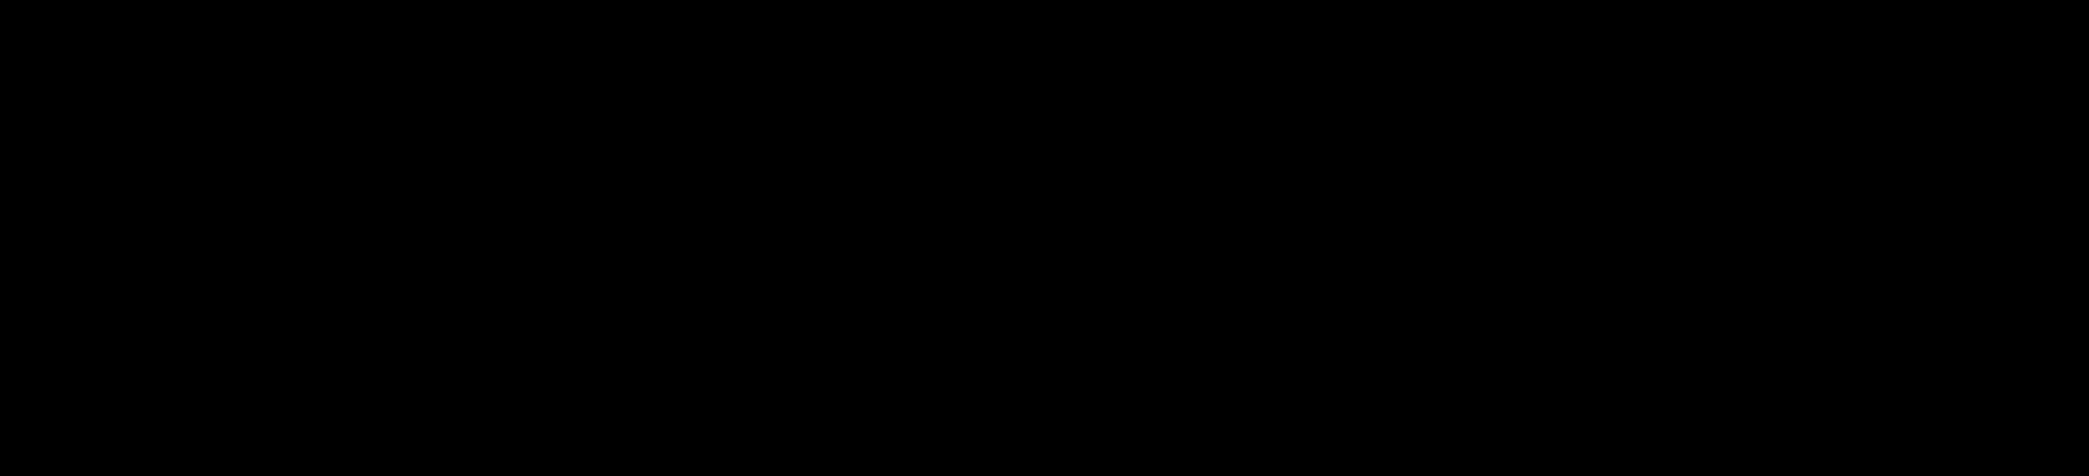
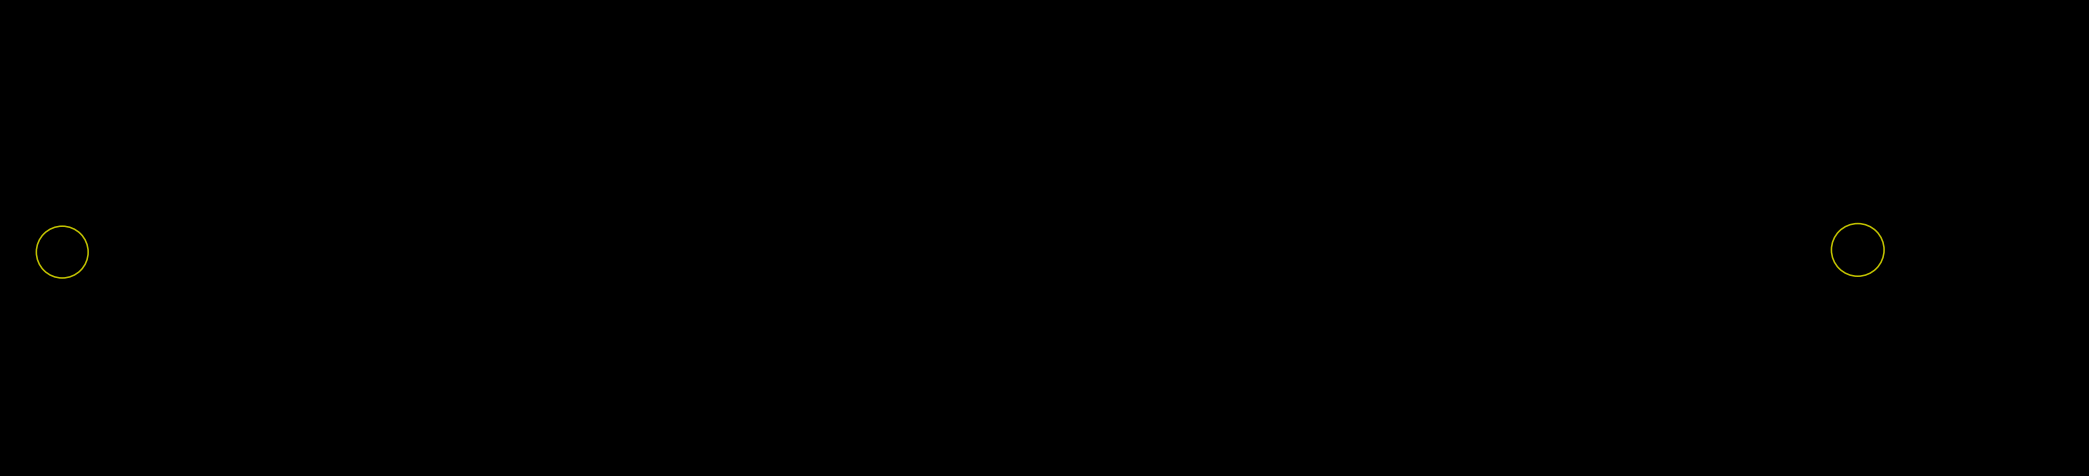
round board edge: none -> [1830, 223, 1885, 277]
round board edge: none -> [35, 225, 89, 279]

